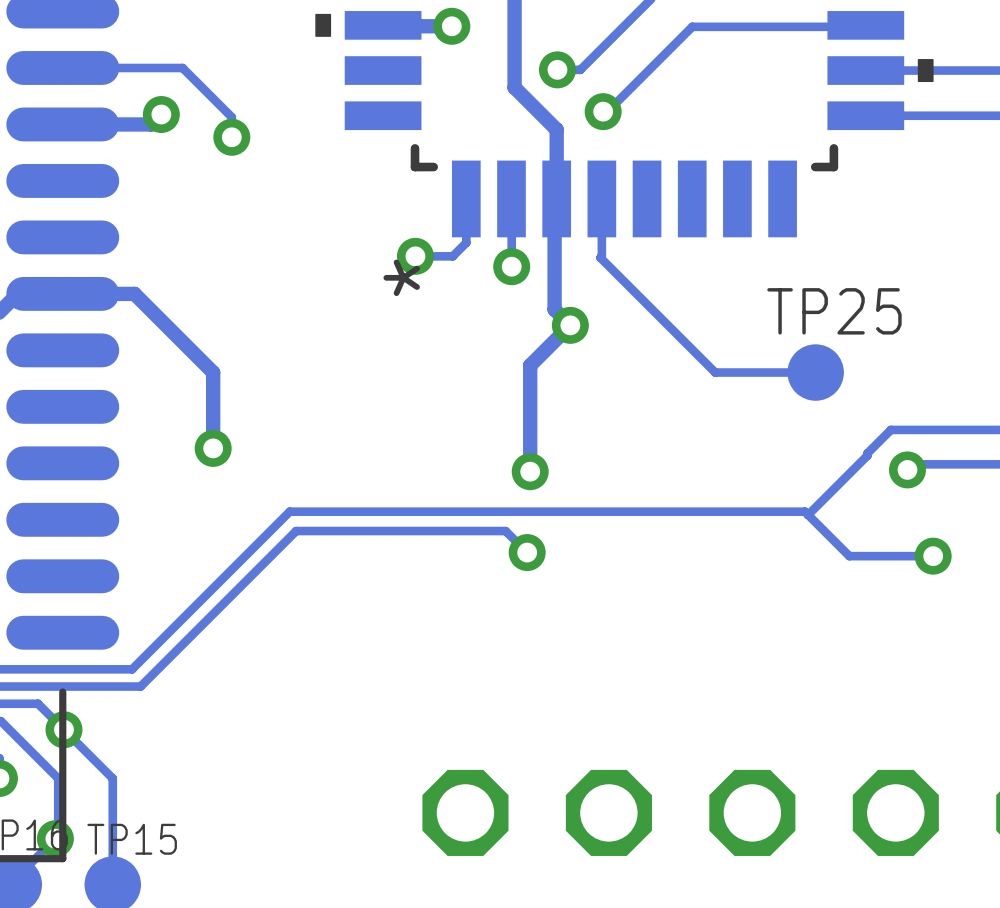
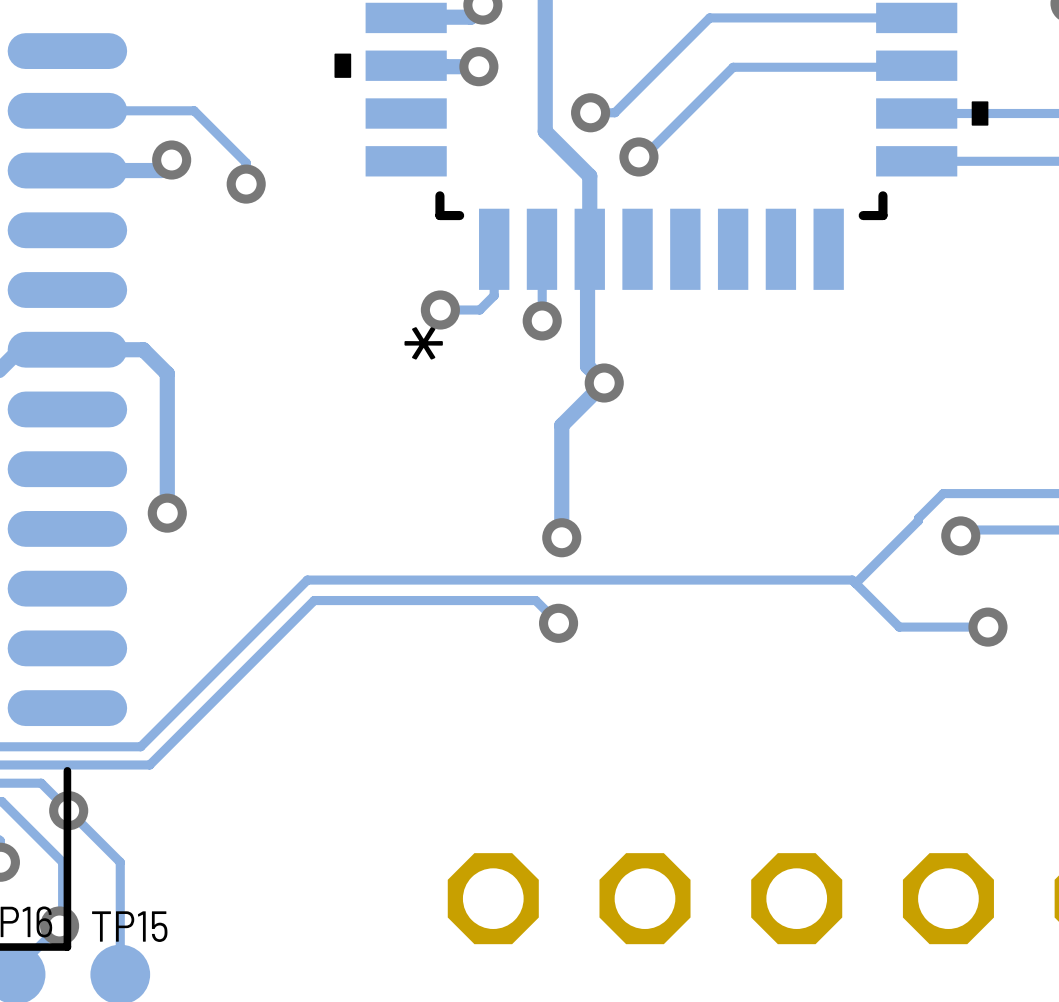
track: (601, 198) (600, 257) (715, 372) (815, 372) -> none
track: (157, 316) (213, 372) (213, 448) -> (167, 373) (167, 513)
TP25: (815, 372) -> none
via position: (213, 448) -> (167, 513)

